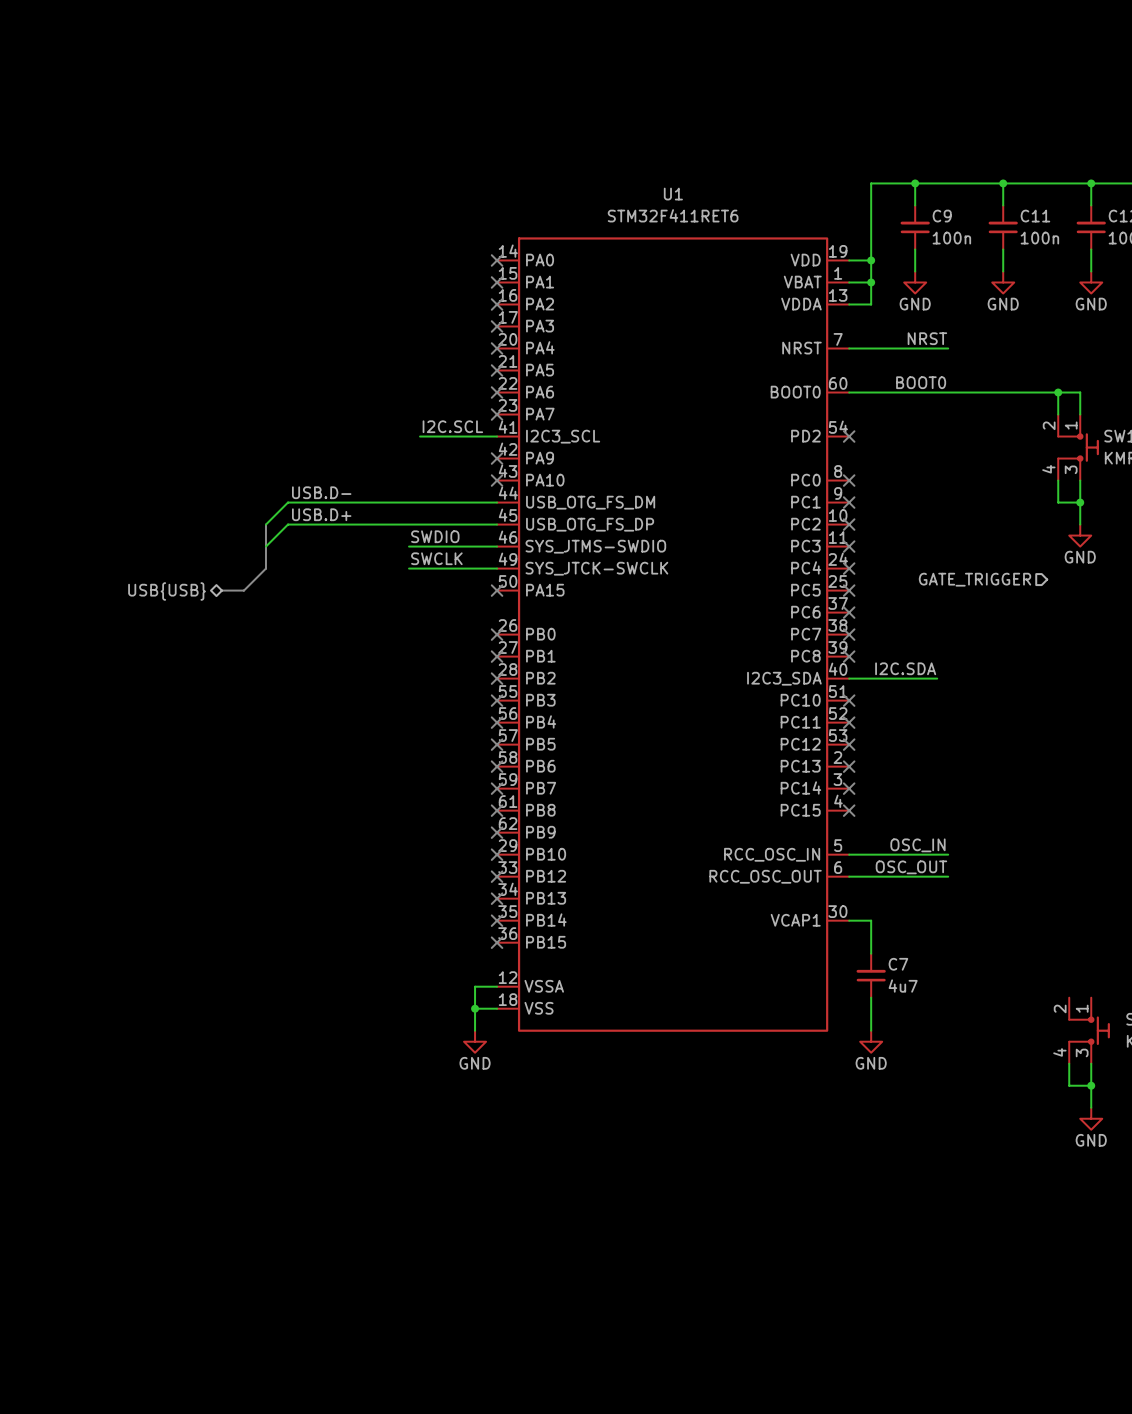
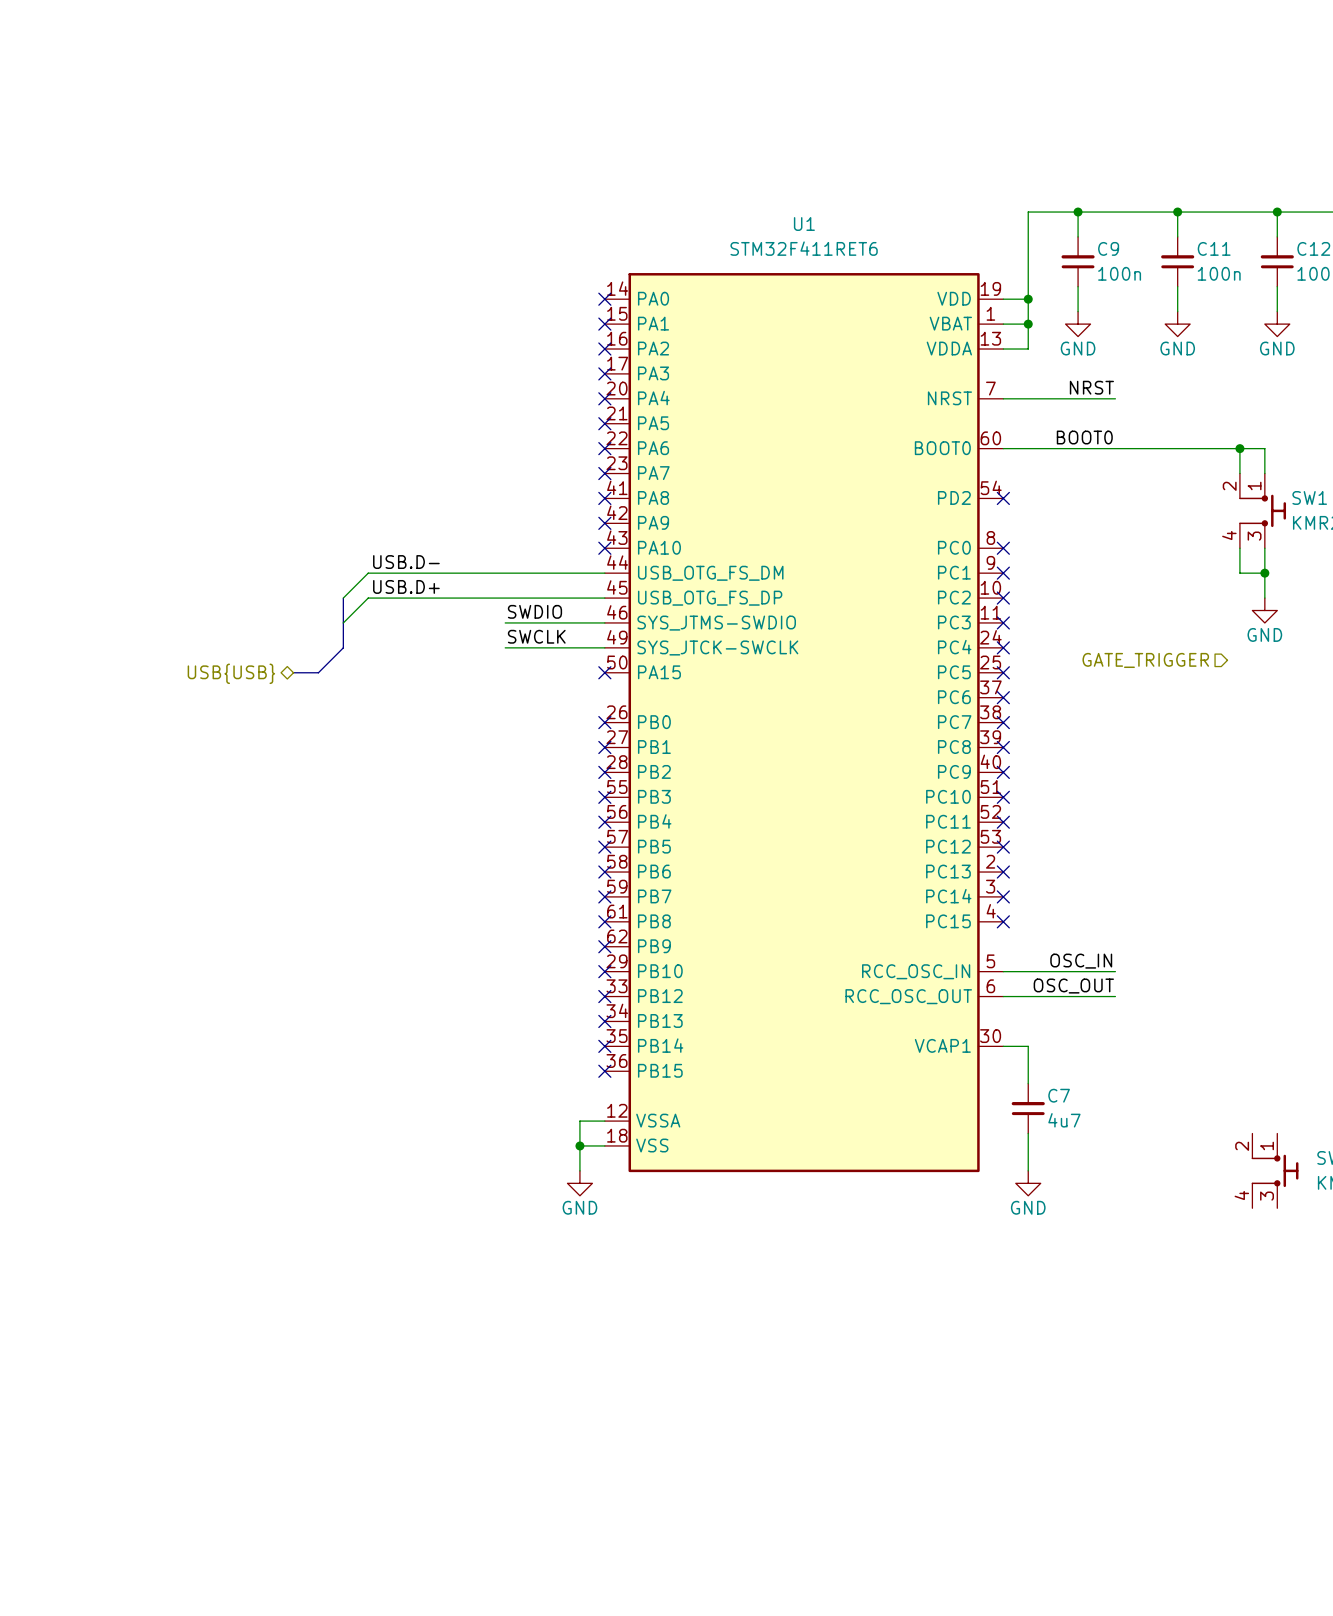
label: I2C.SCL (452, 426) -> none
wire: (420, 436) (497, 436) -> none
no-connect mark: none -> (604, 498)
U1 pin name: I2C3_SCL (563, 436) -> PA8 (653, 497)
label: I2C.SDA (905, 668) -> none
U1 pin name: I2C3_SDA (784, 678) -> PC9 (954, 771)
wire: (849, 678) (937, 678) -> none
no-connect mark: none -> (1003, 772)
wire: (1069, 1063) (1069, 1085) (1091, 1085) -> none
wire: (1091, 1063) (1091, 1107) -> none
junction: (1091, 1085) -> none
power symbol: GND (1091, 1118) -> none

